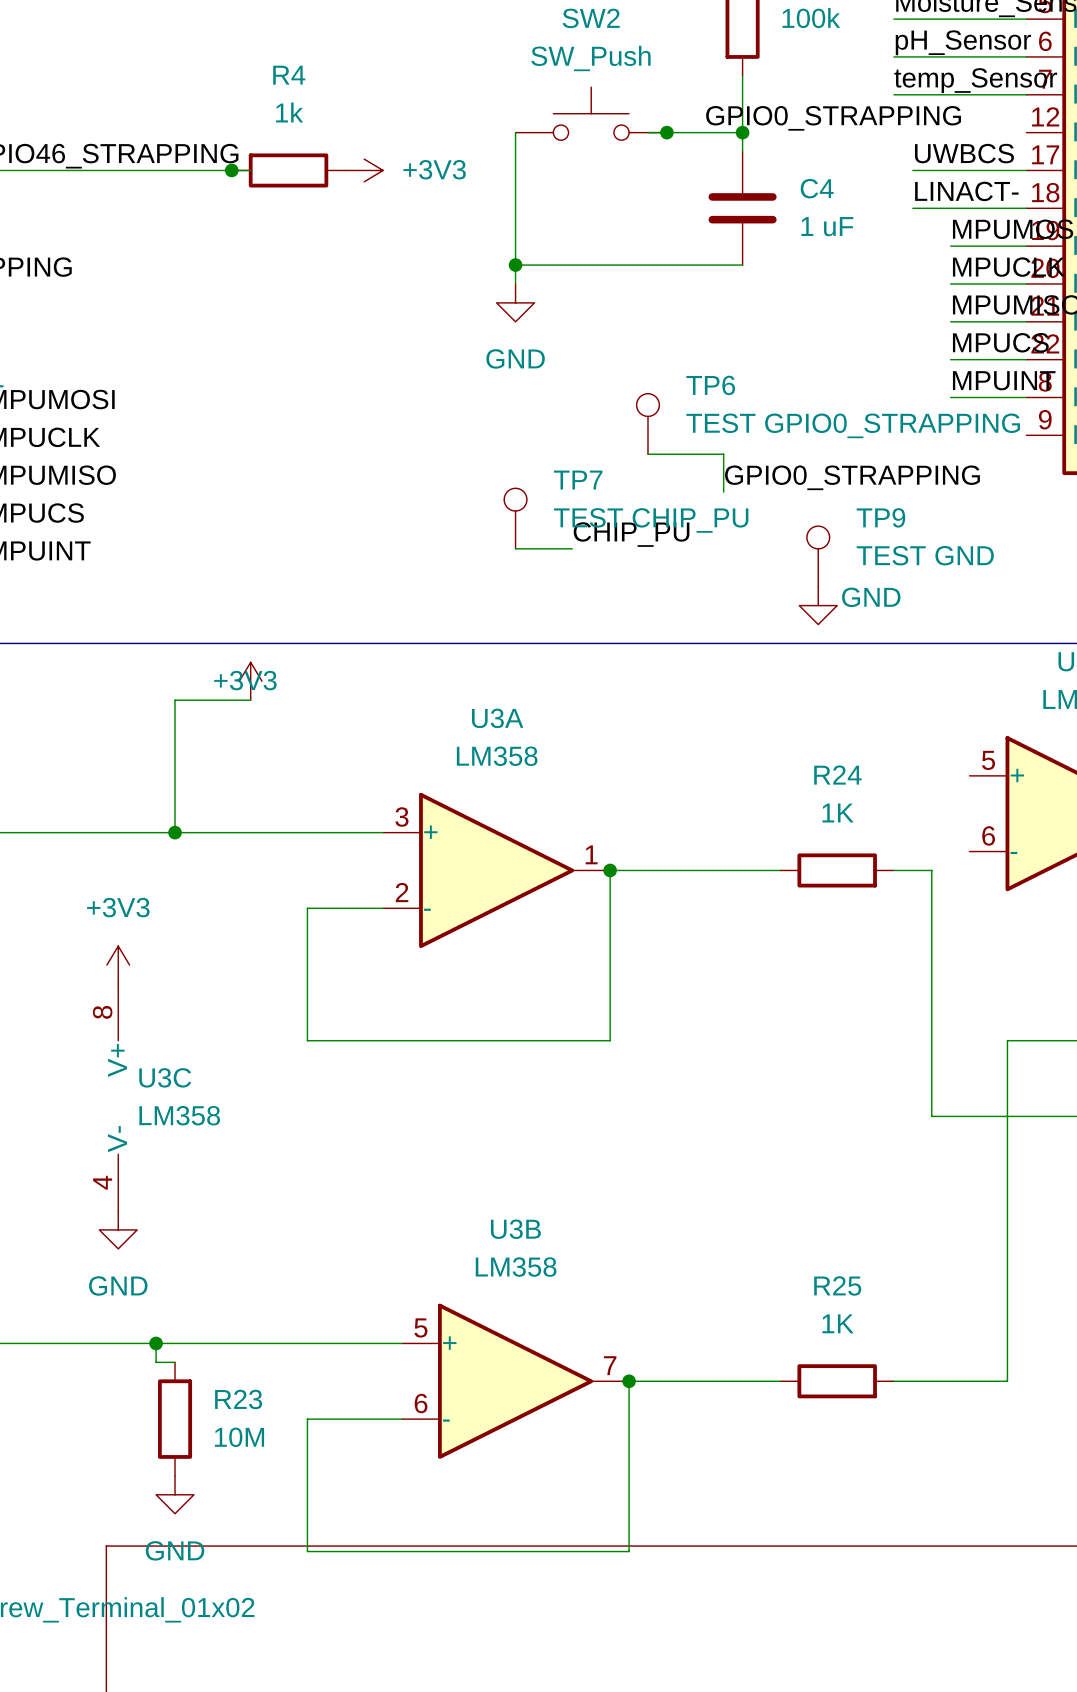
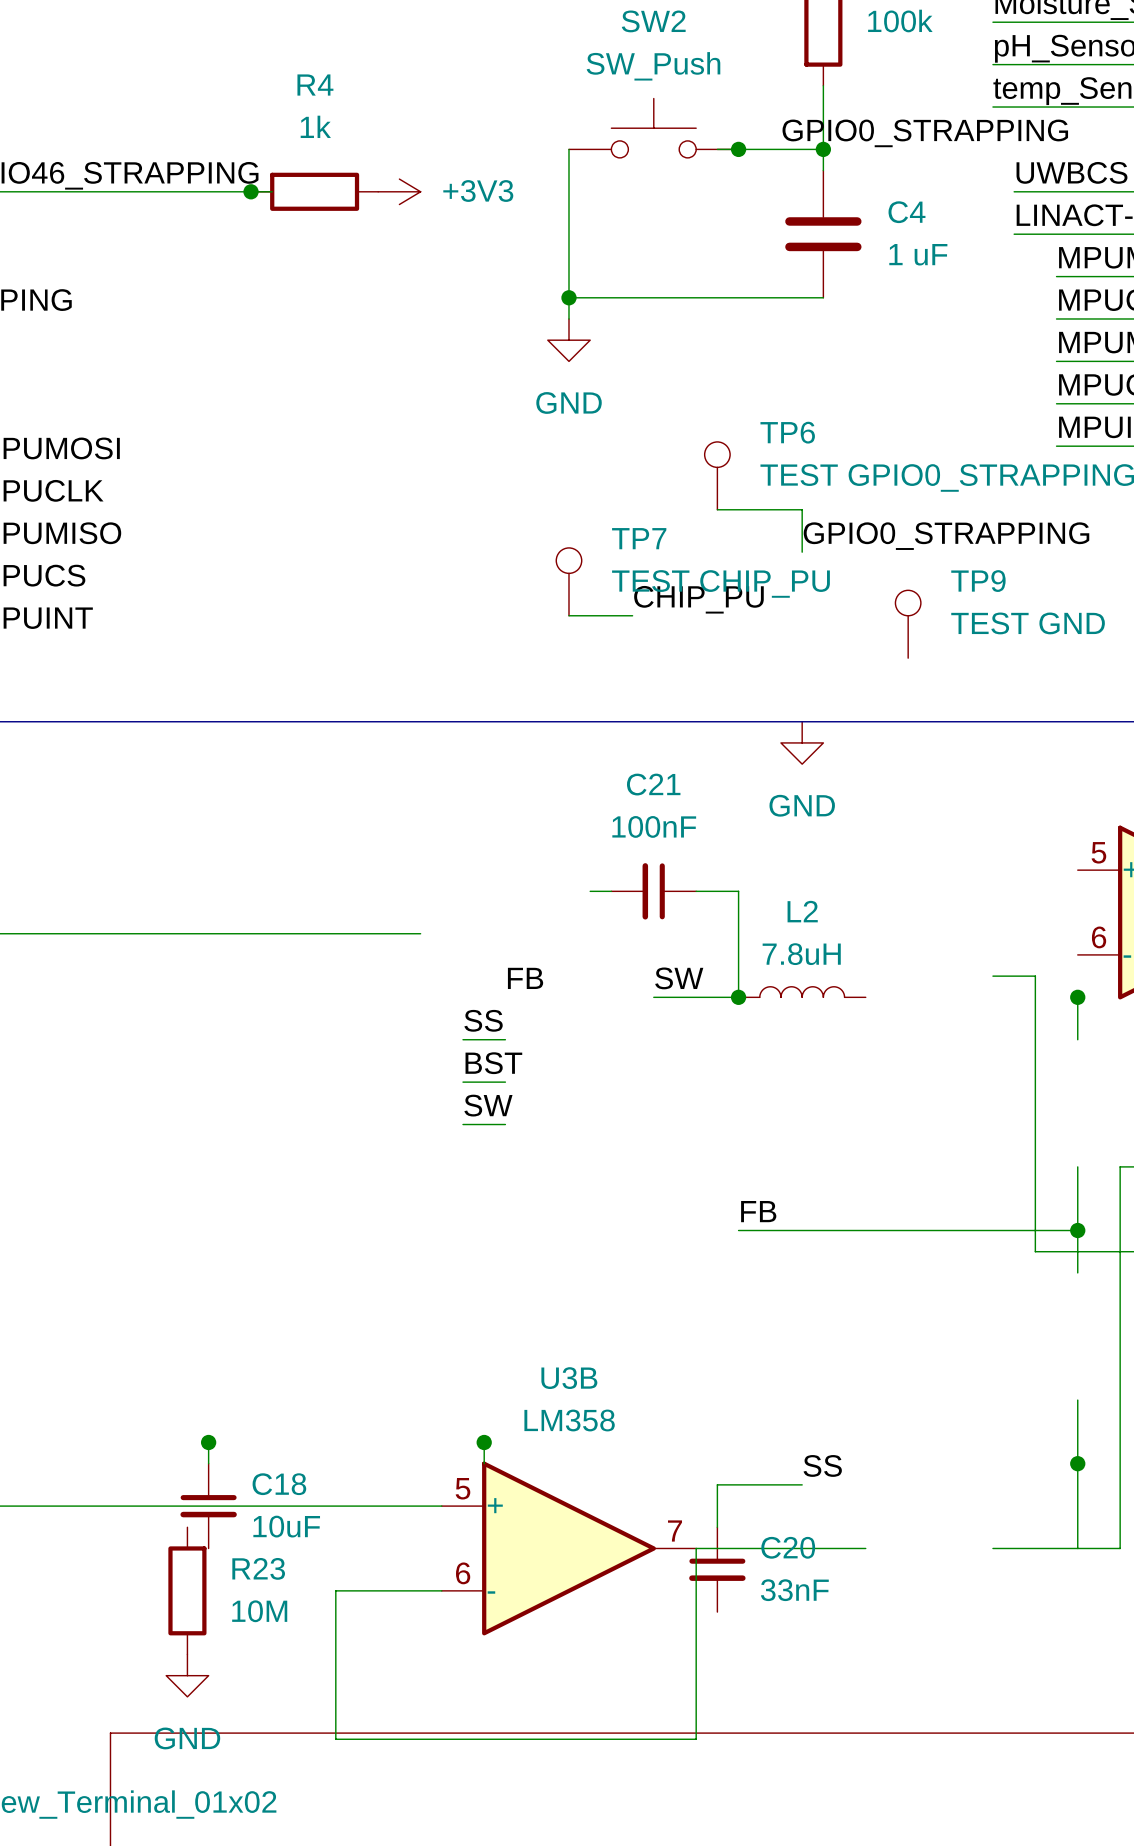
power symbol text position: GND (871, 597) -> GND (802, 805)
power symbol position: GND (818, 605) -> GND (802, 742)
power symbol: +3V3 (250, 681) -> none
wire: (250, 700) (175, 700) (175, 832) -> none
wire: none -> (590, 891) (611, 891)
C21: none -> 100nF (653, 891)
wire: none -> (696, 891) (738, 891) (738, 997) (653, 997)
junction: (175, 832) -> none
U3A: LM358 (496, 870) -> none
junction position: (610, 870) -> (738, 997)
wire: (780, 870) (610, 870) (610, 1040) (307, 1040) (307, 908) (383, 908) -> none
R24: 1K (837, 870) -> none
label: none -> FB (525, 978)
label: none -> SW (679, 978)
L2: none -> 7.8uH (802, 992)
wire: none -> (1077, 997) (1077, 1039)
junction: none -> (1077, 997)
label: none -> SS (483, 1020)
label: none -> BST (493, 1063)
power symbol: +3V3 (118, 965) -> none
wire: none -> (463, 1082) (505, 1082)
label: none -> SW (488, 1105)
wire: none -> (463, 1124) (505, 1124)
wire: none -> (1077, 1166) (1077, 1272)
label: none -> FB (758, 1211)
U3C: LM358 (118, 1097) -> none
wire: none -> (738, 1230) (1077, 1230)
junction: none -> (1077, 1230)
power symbol: GND (118, 1229) -> none
wire: none -> (1077, 1400) (1077, 1548)
wire: none -> (208, 1442) (208, 1463)
wire: none -> (484, 1442) (484, 1463)
junction: none -> (484, 1442)
junction: none -> (1077, 1463)
label: none -> SS (822, 1465)
wire: none -> (802, 1484) (717, 1484) (717, 1527)
wire: (156, 1343) (156, 1362) (175, 1362) -> none
junction position: (156, 1343) -> (208, 1442)
C18: none -> 10uF (208, 1506)
junction: (629, 1381) -> none
R25: 1K (837, 1381) -> none
C20: none -> 33nF (717, 1569)

